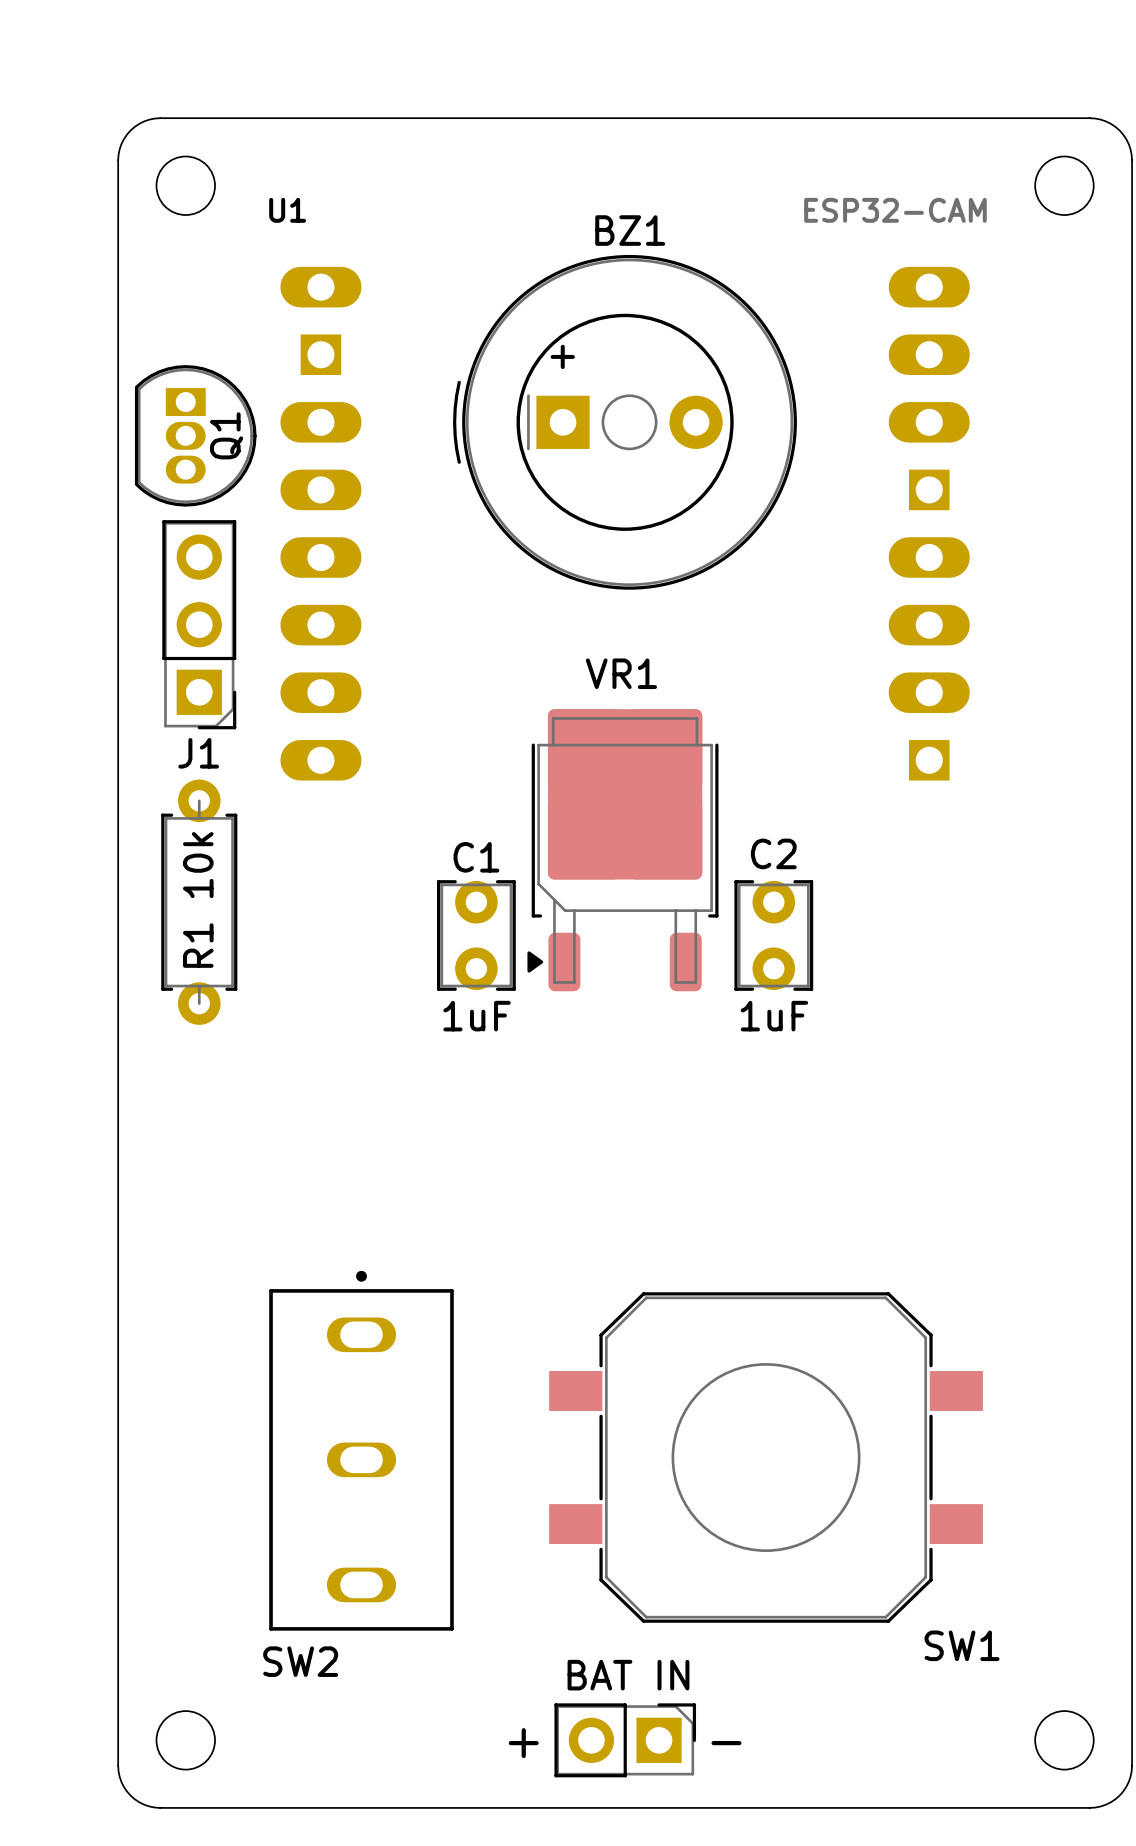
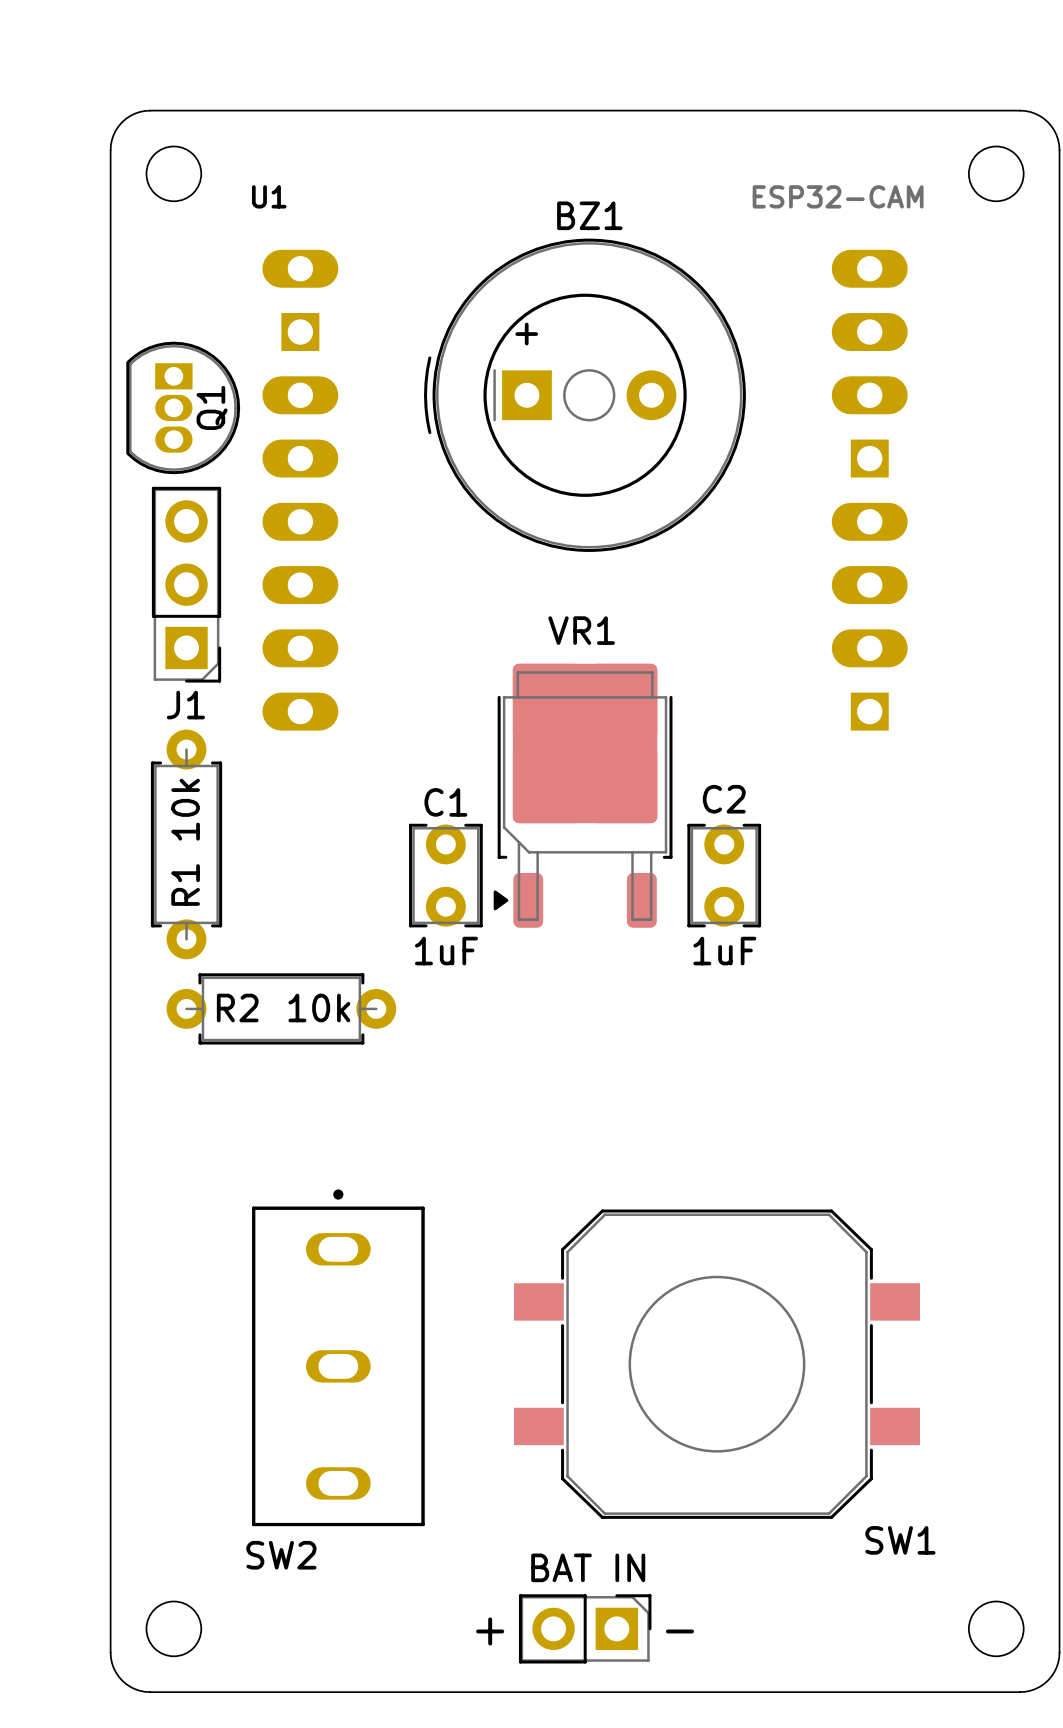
R2: none -> 10k (281, 1008)

